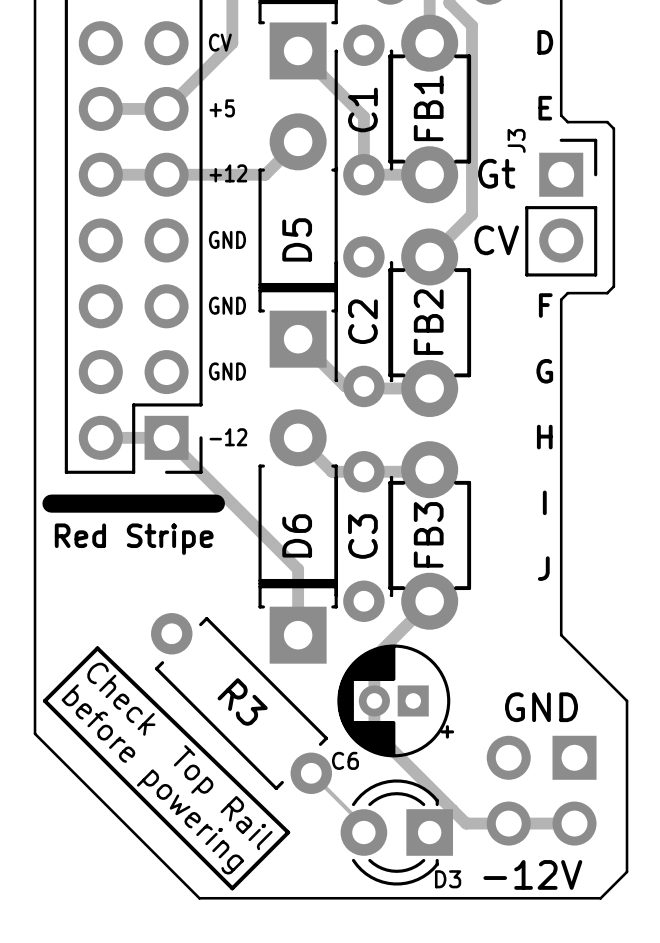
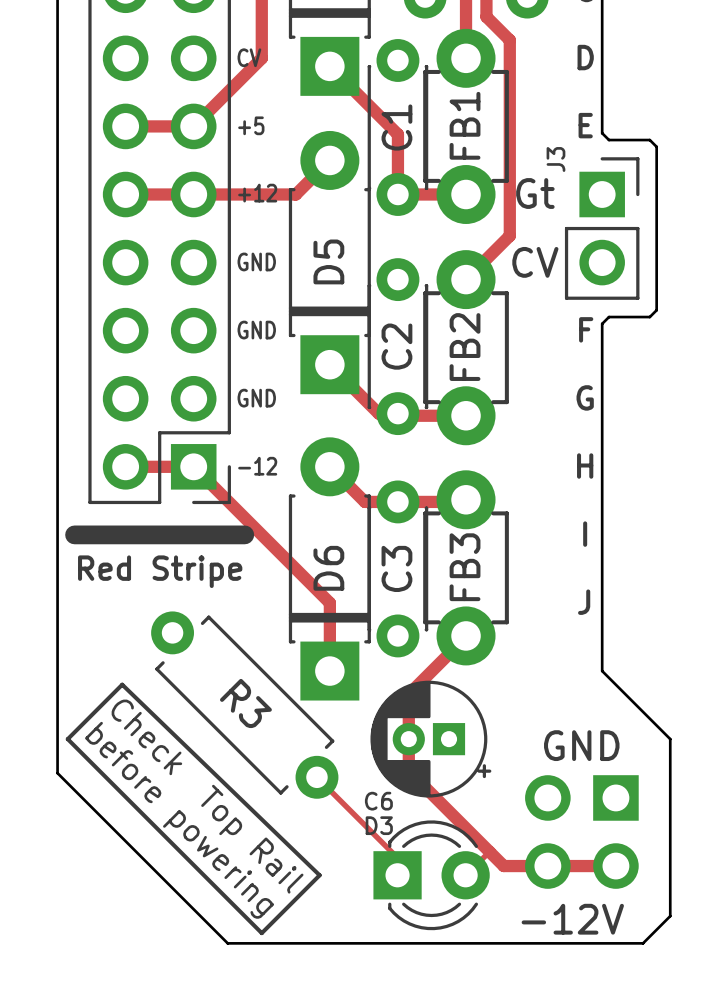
R3 position: (241, 703) -> (244, 705)
track: none -> (316, 777) (397, 857)
track: (311, 773) (363, 825) (363, 832) -> none
D3 rotation: 0° (396, 832) -> 180° (431, 875)

